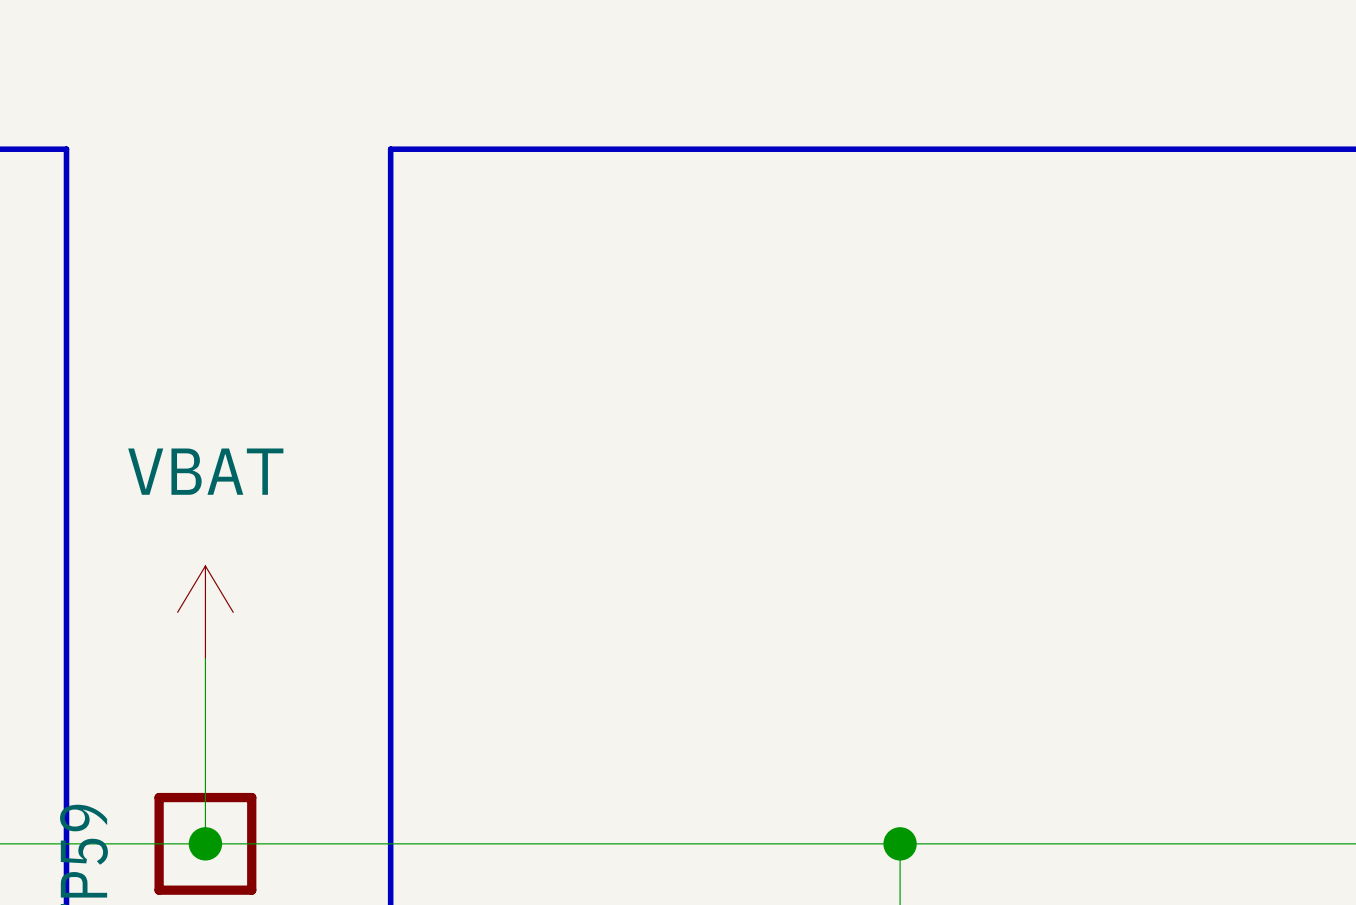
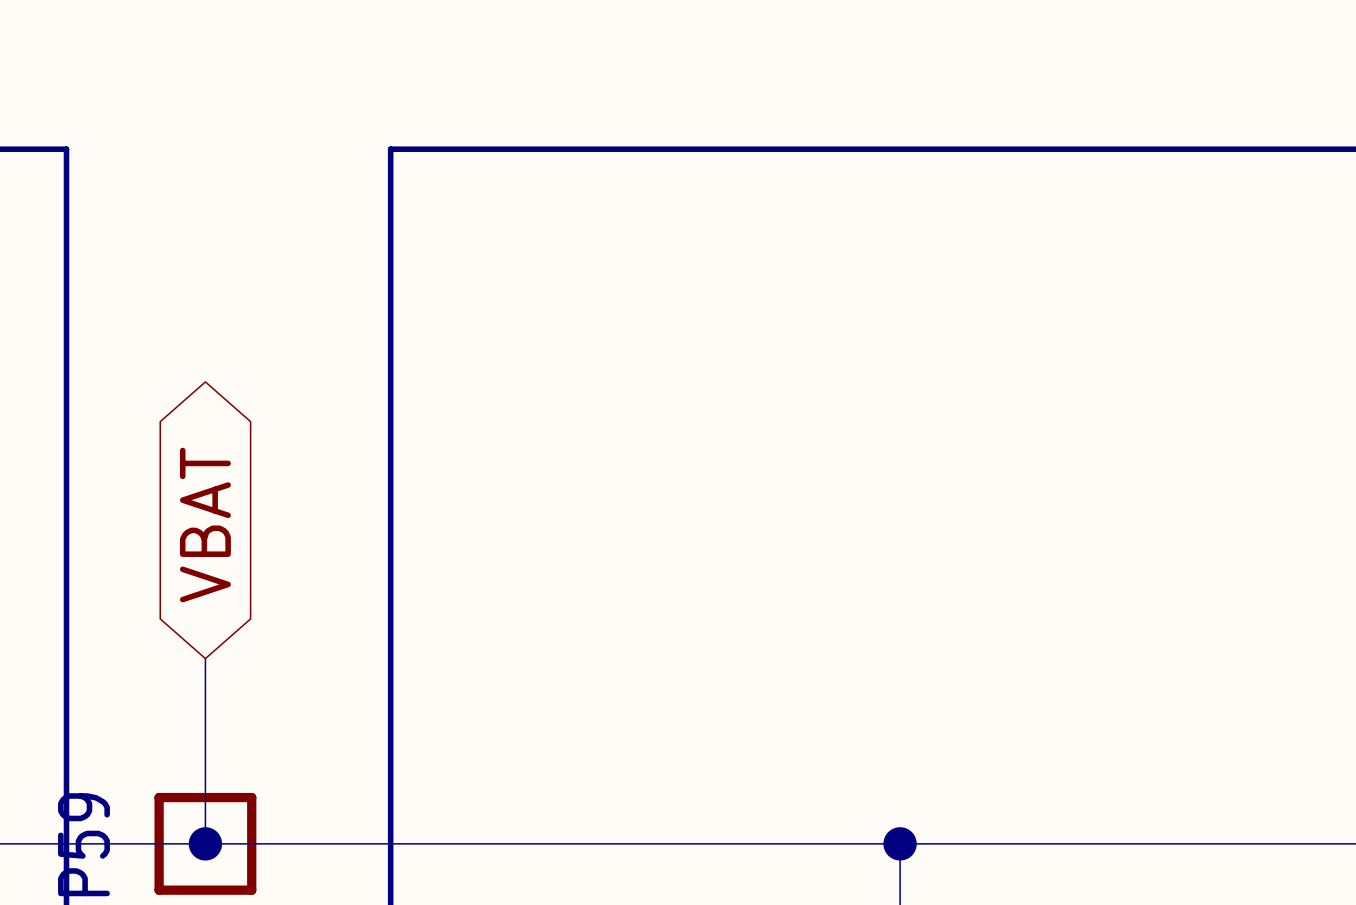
global label: none -> VBAT (205, 525)
power symbol: VBAT (205, 612) -> none

